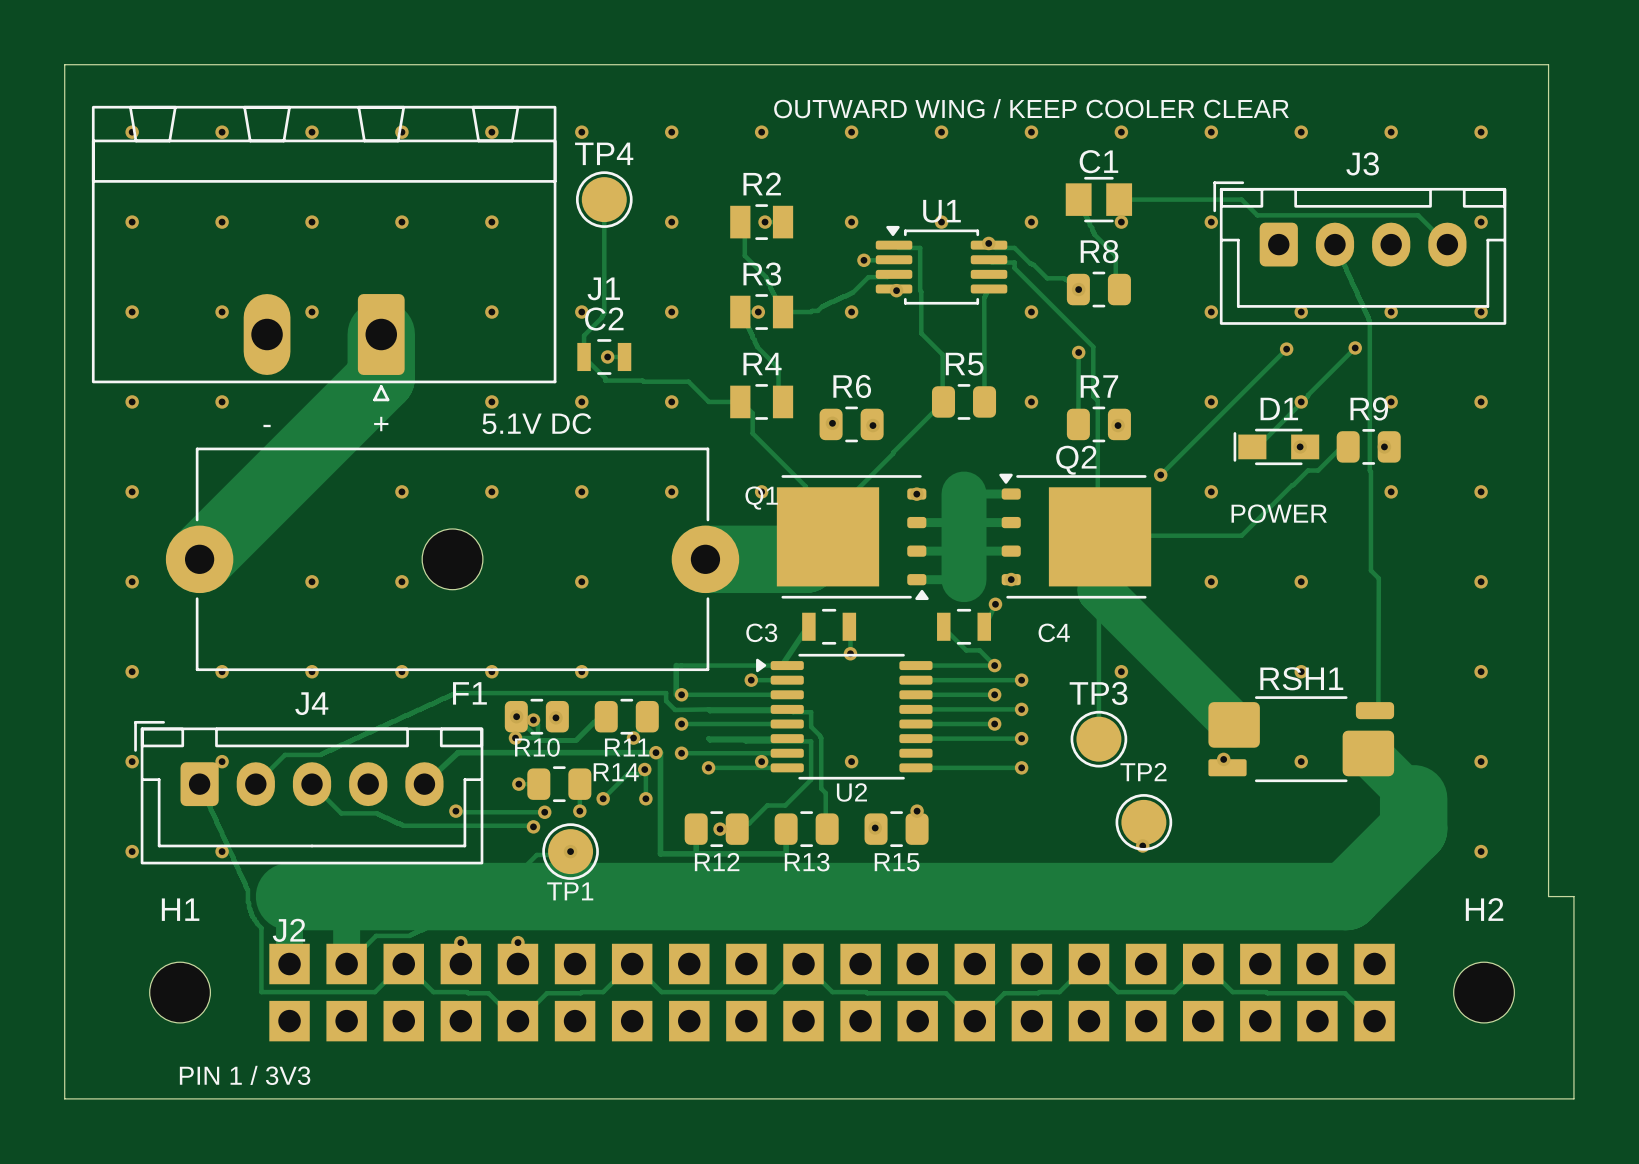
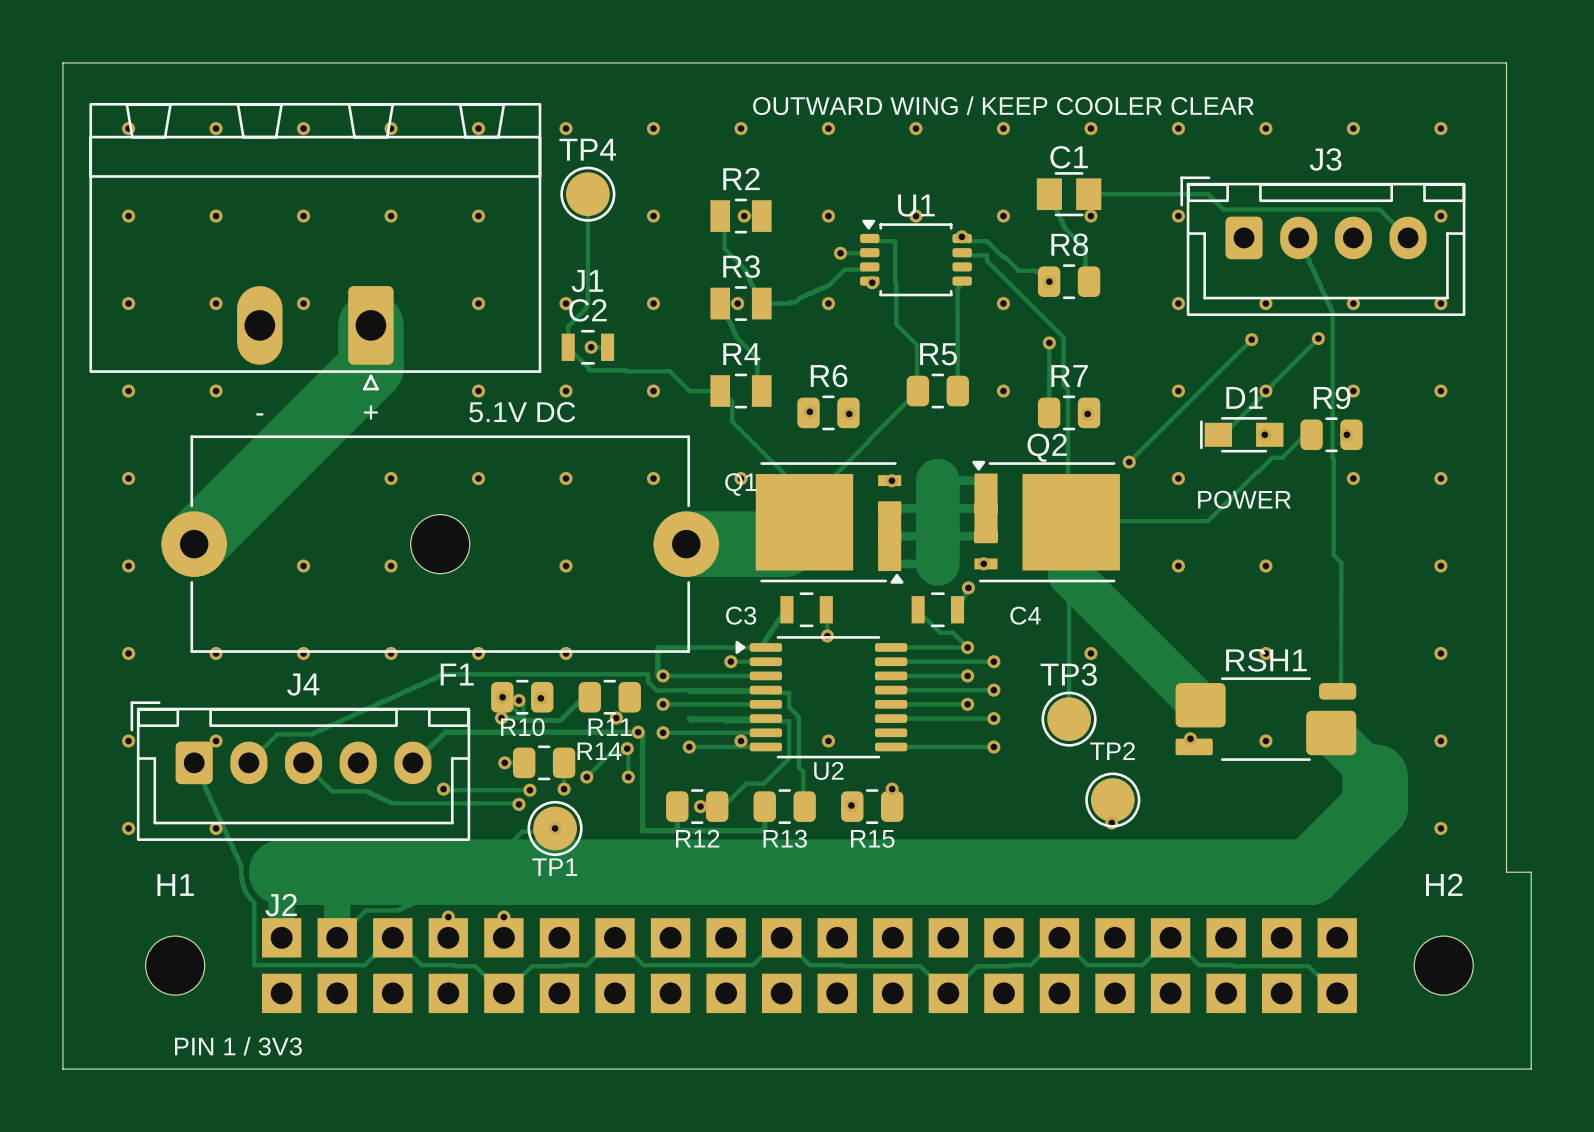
U1 footprint: [875, 225, 1008, 305] -> [860, 219, 972, 297]
Q2 footprint: [999, 473, 1152, 599] -> [972, 460, 1120, 583]
Q1 footprint: [776, 475, 929, 601] -> [755, 462, 904, 584]

